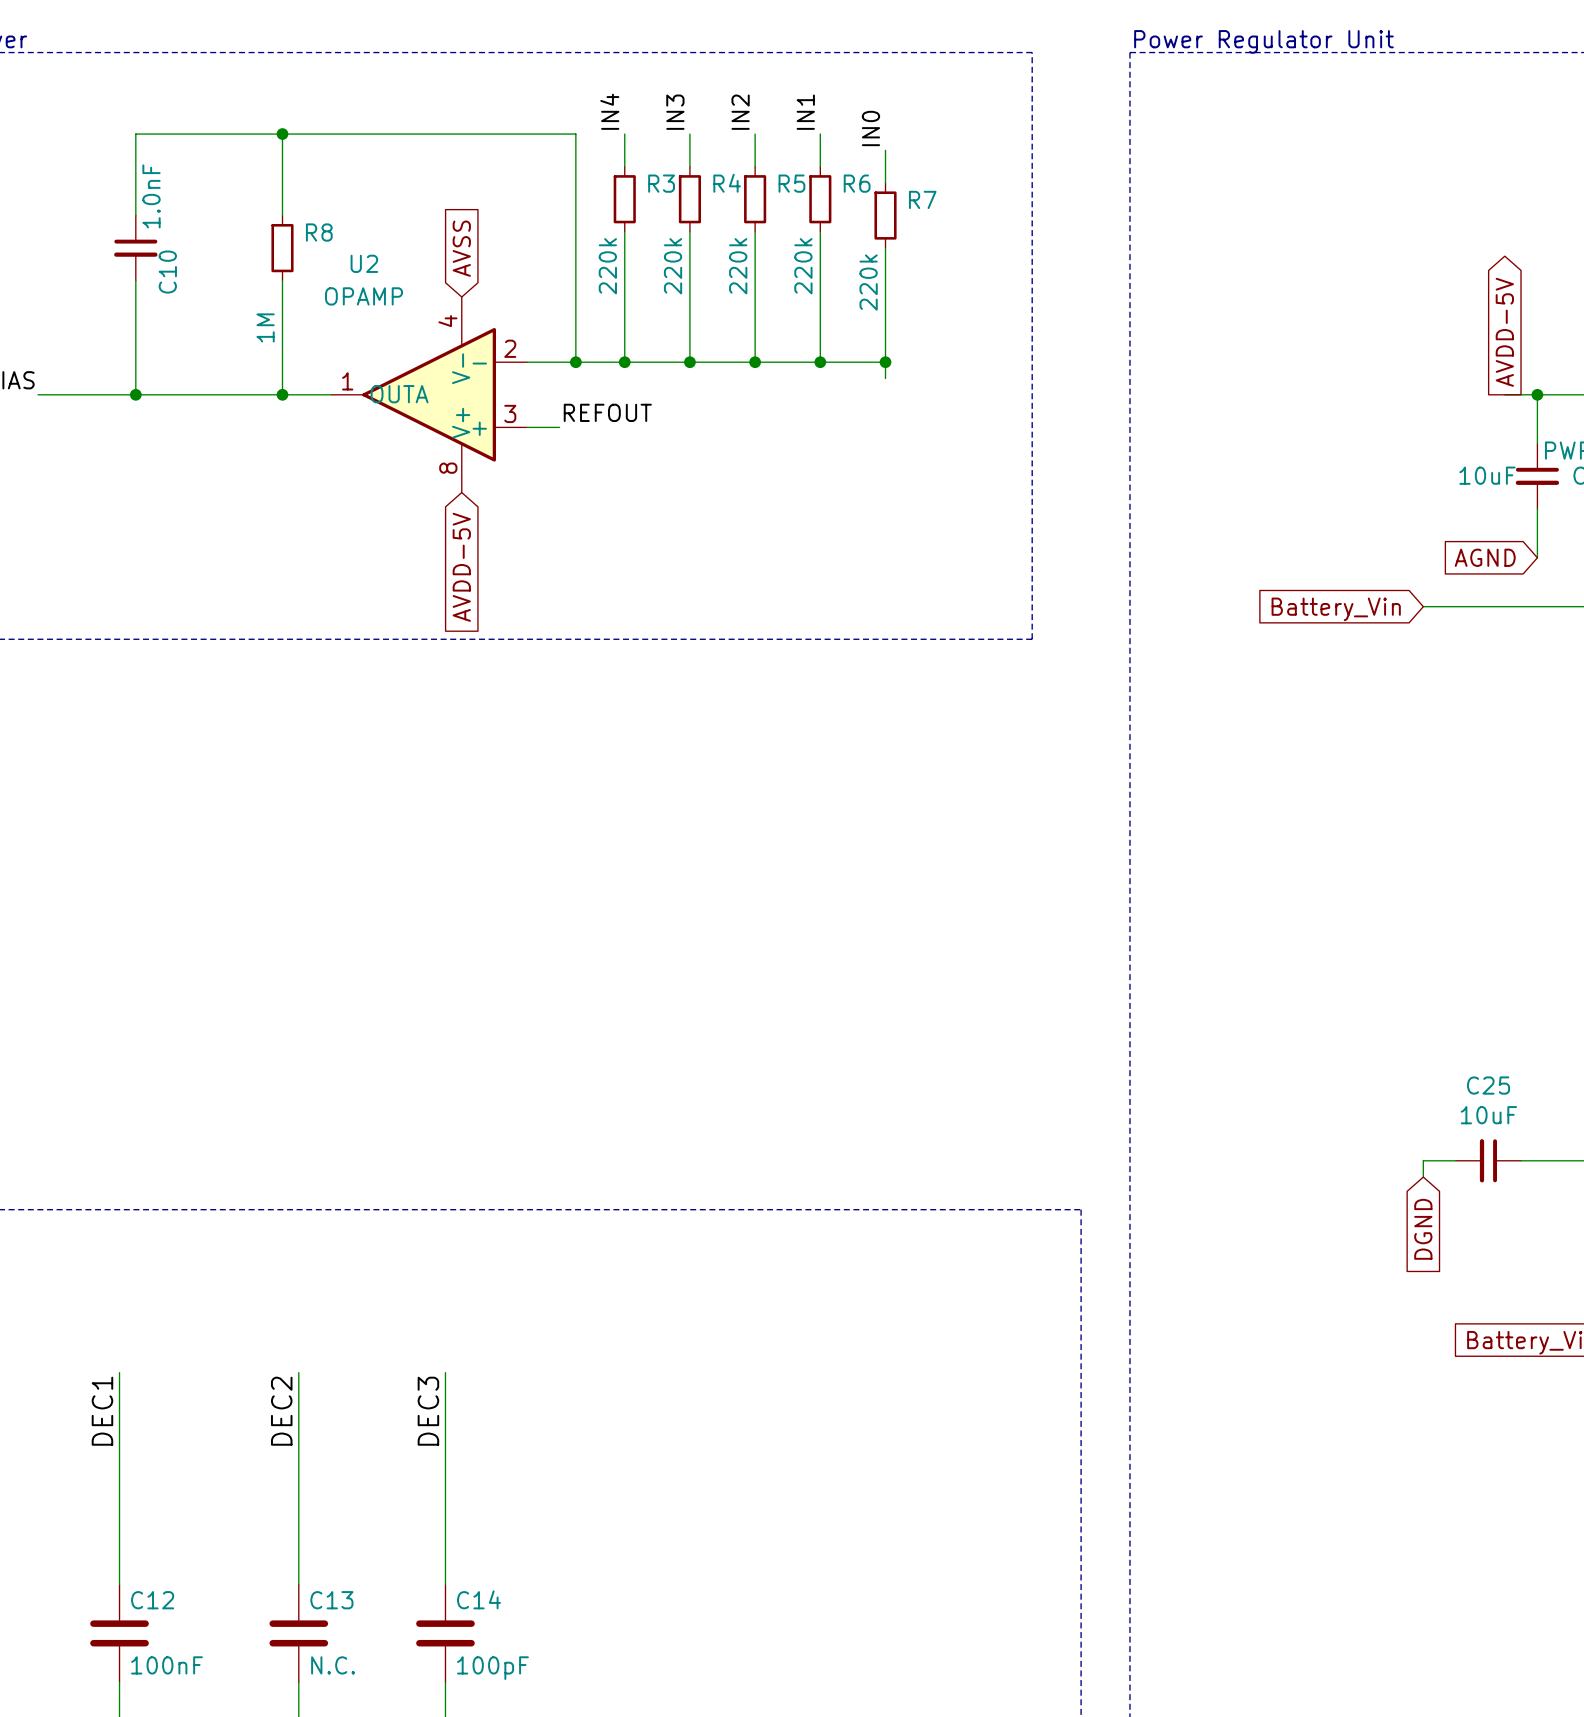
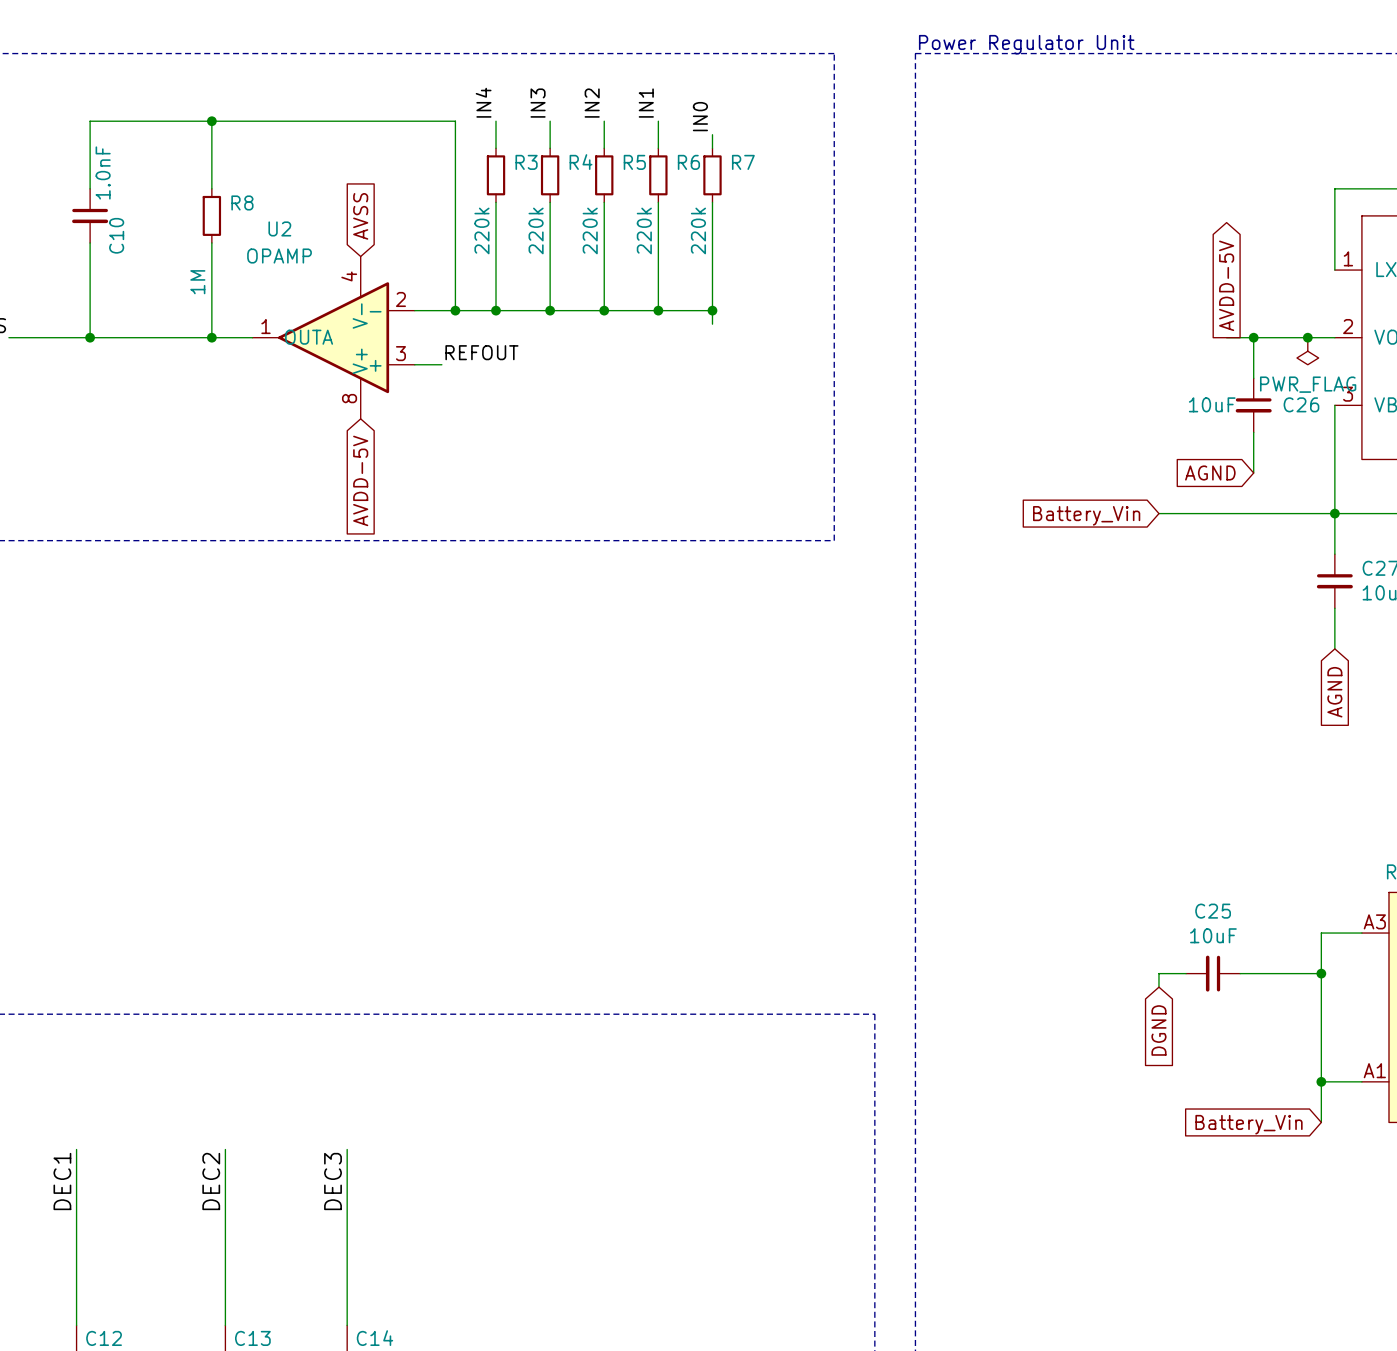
R7 position: (885, 215) -> (712, 175)

